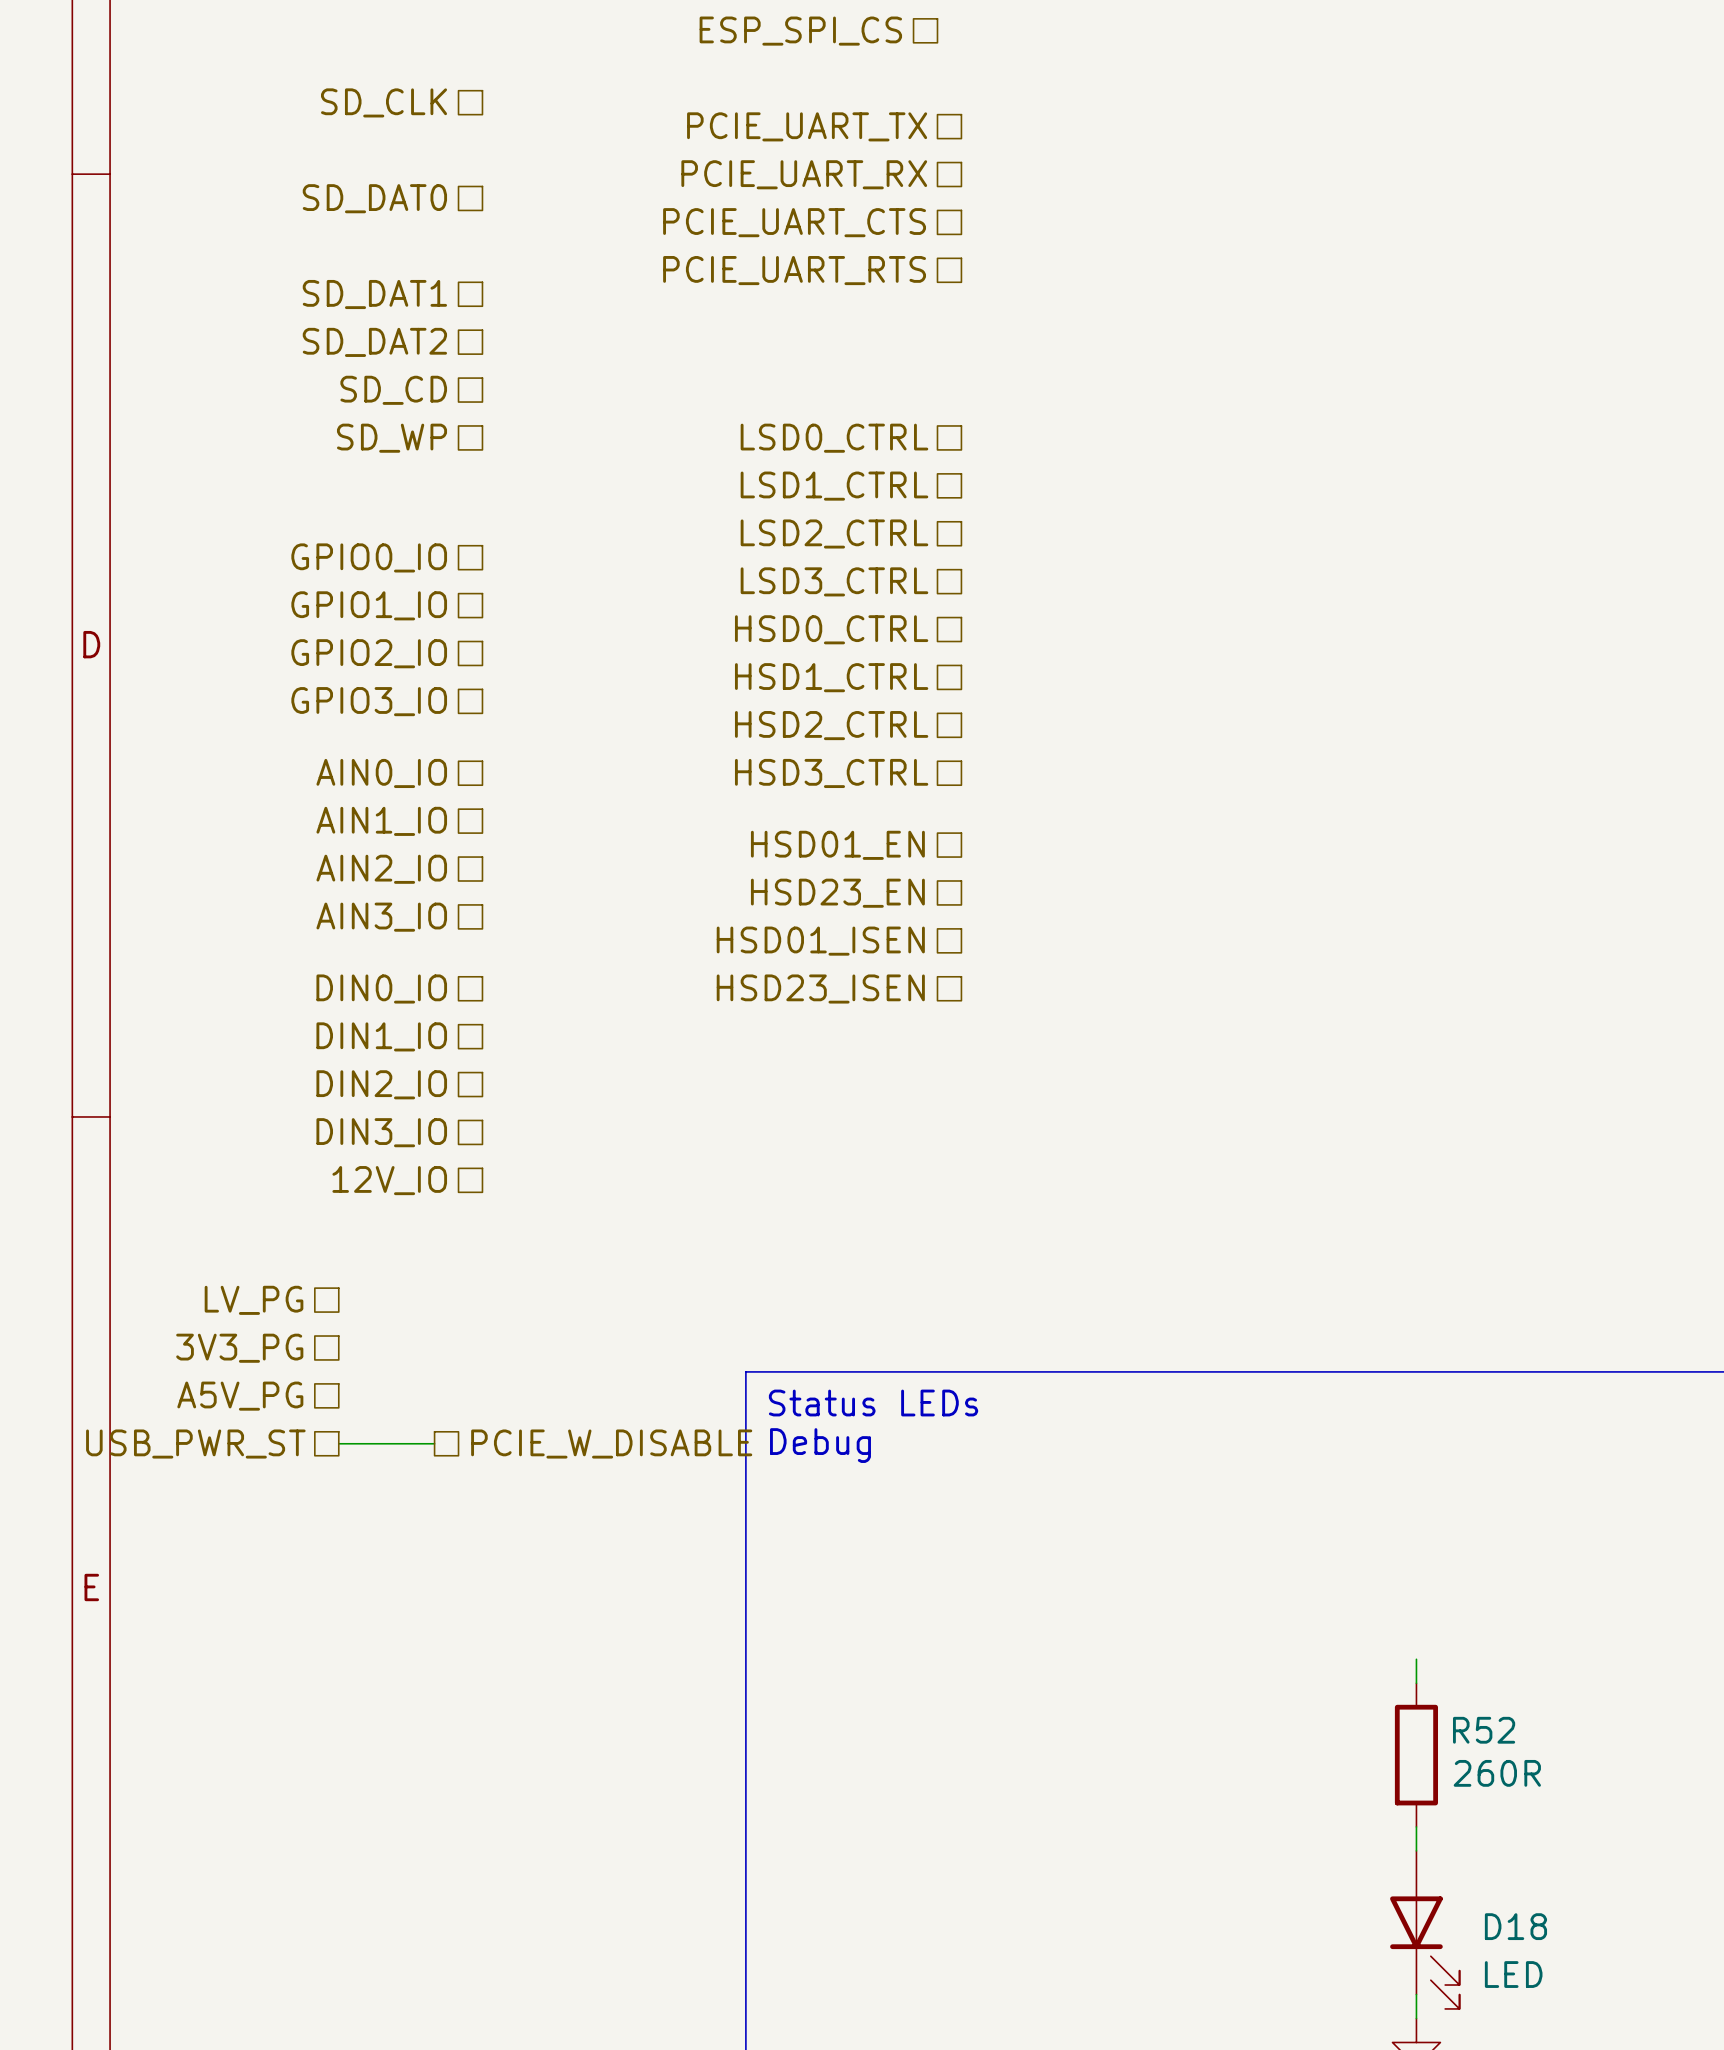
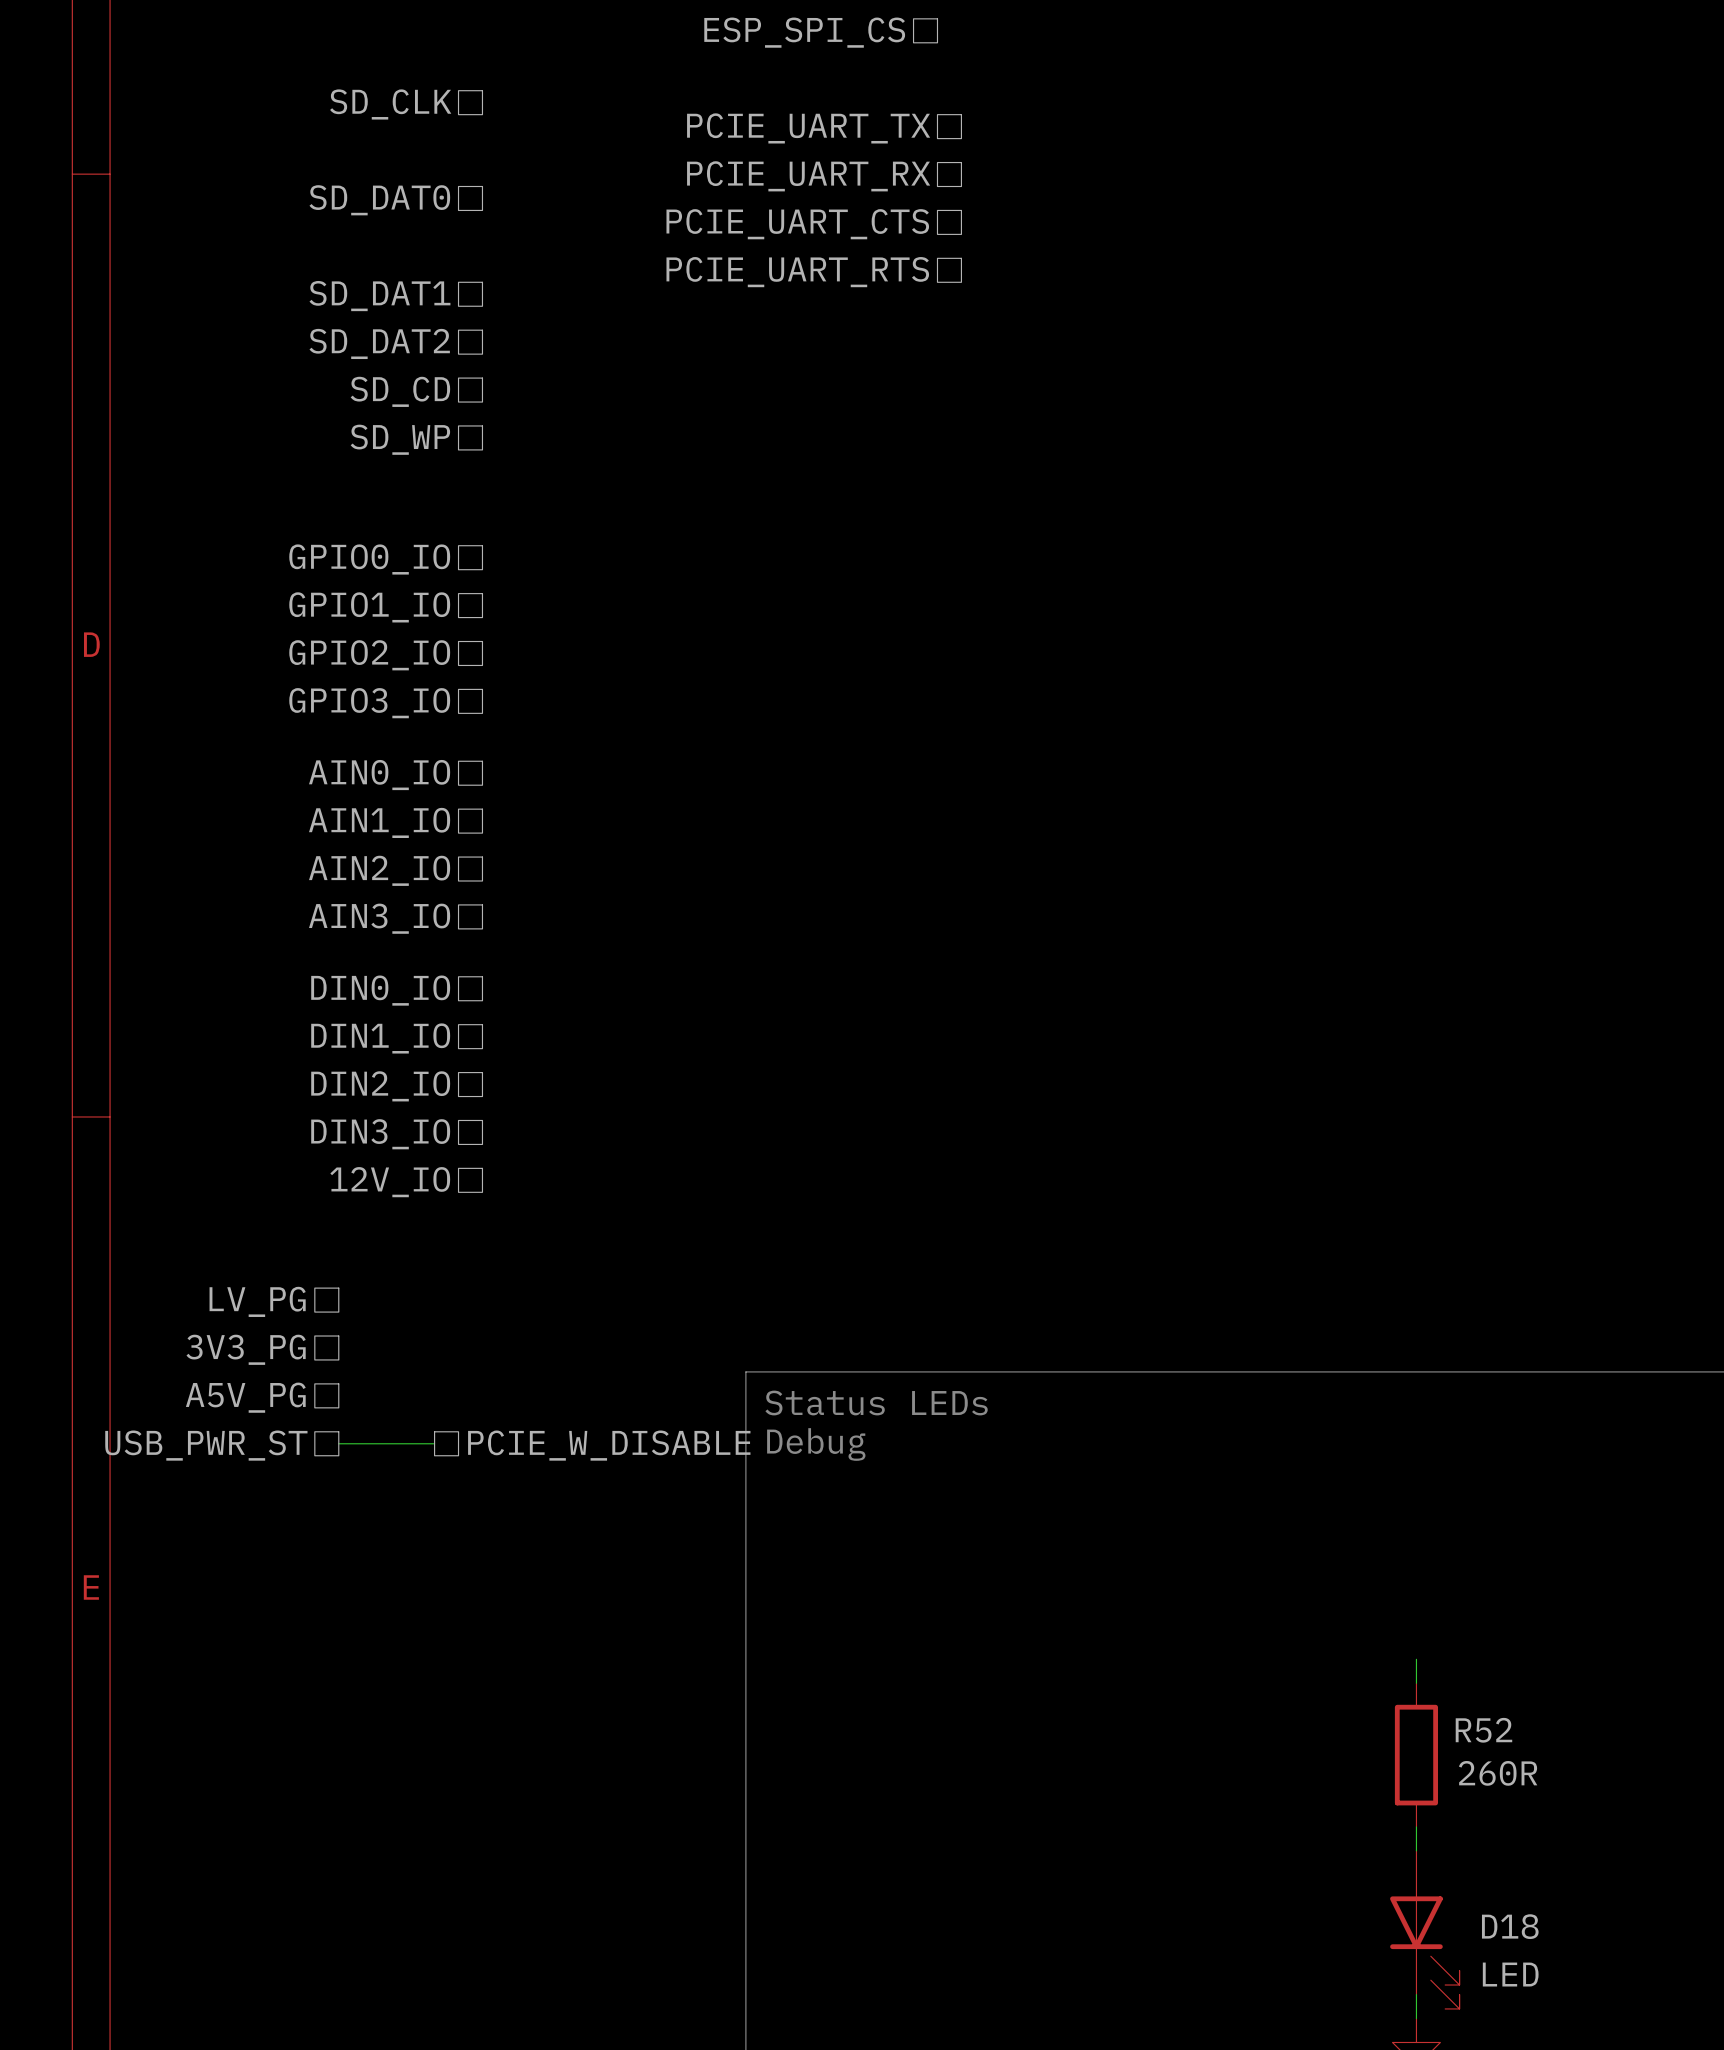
hierarchical label: LSD0_CTRL (834, 438) -> none
hierarchical label: LSD1_CTRL (834, 486) -> none
hierarchical label: LSD2_CTRL (834, 533) -> none
hierarchical label: LSD3_CTRL (834, 581) -> none
hierarchical label: HSD0_CTRL (831, 629) -> none
hierarchical label: HSD1_CTRL (831, 677) -> none
hierarchical label: HSD2_CTRL (831, 725) -> none
hierarchical label: HSD3_CTRL (831, 773) -> none
hierarchical label: HSD01_EN (837, 845) -> none
hierarchical label: HSD23_EN (837, 893) -> none
hierarchical label: HSD01_ISEN (820, 941) -> none
hierarchical label: HSD23_ISEN (820, 989) -> none

